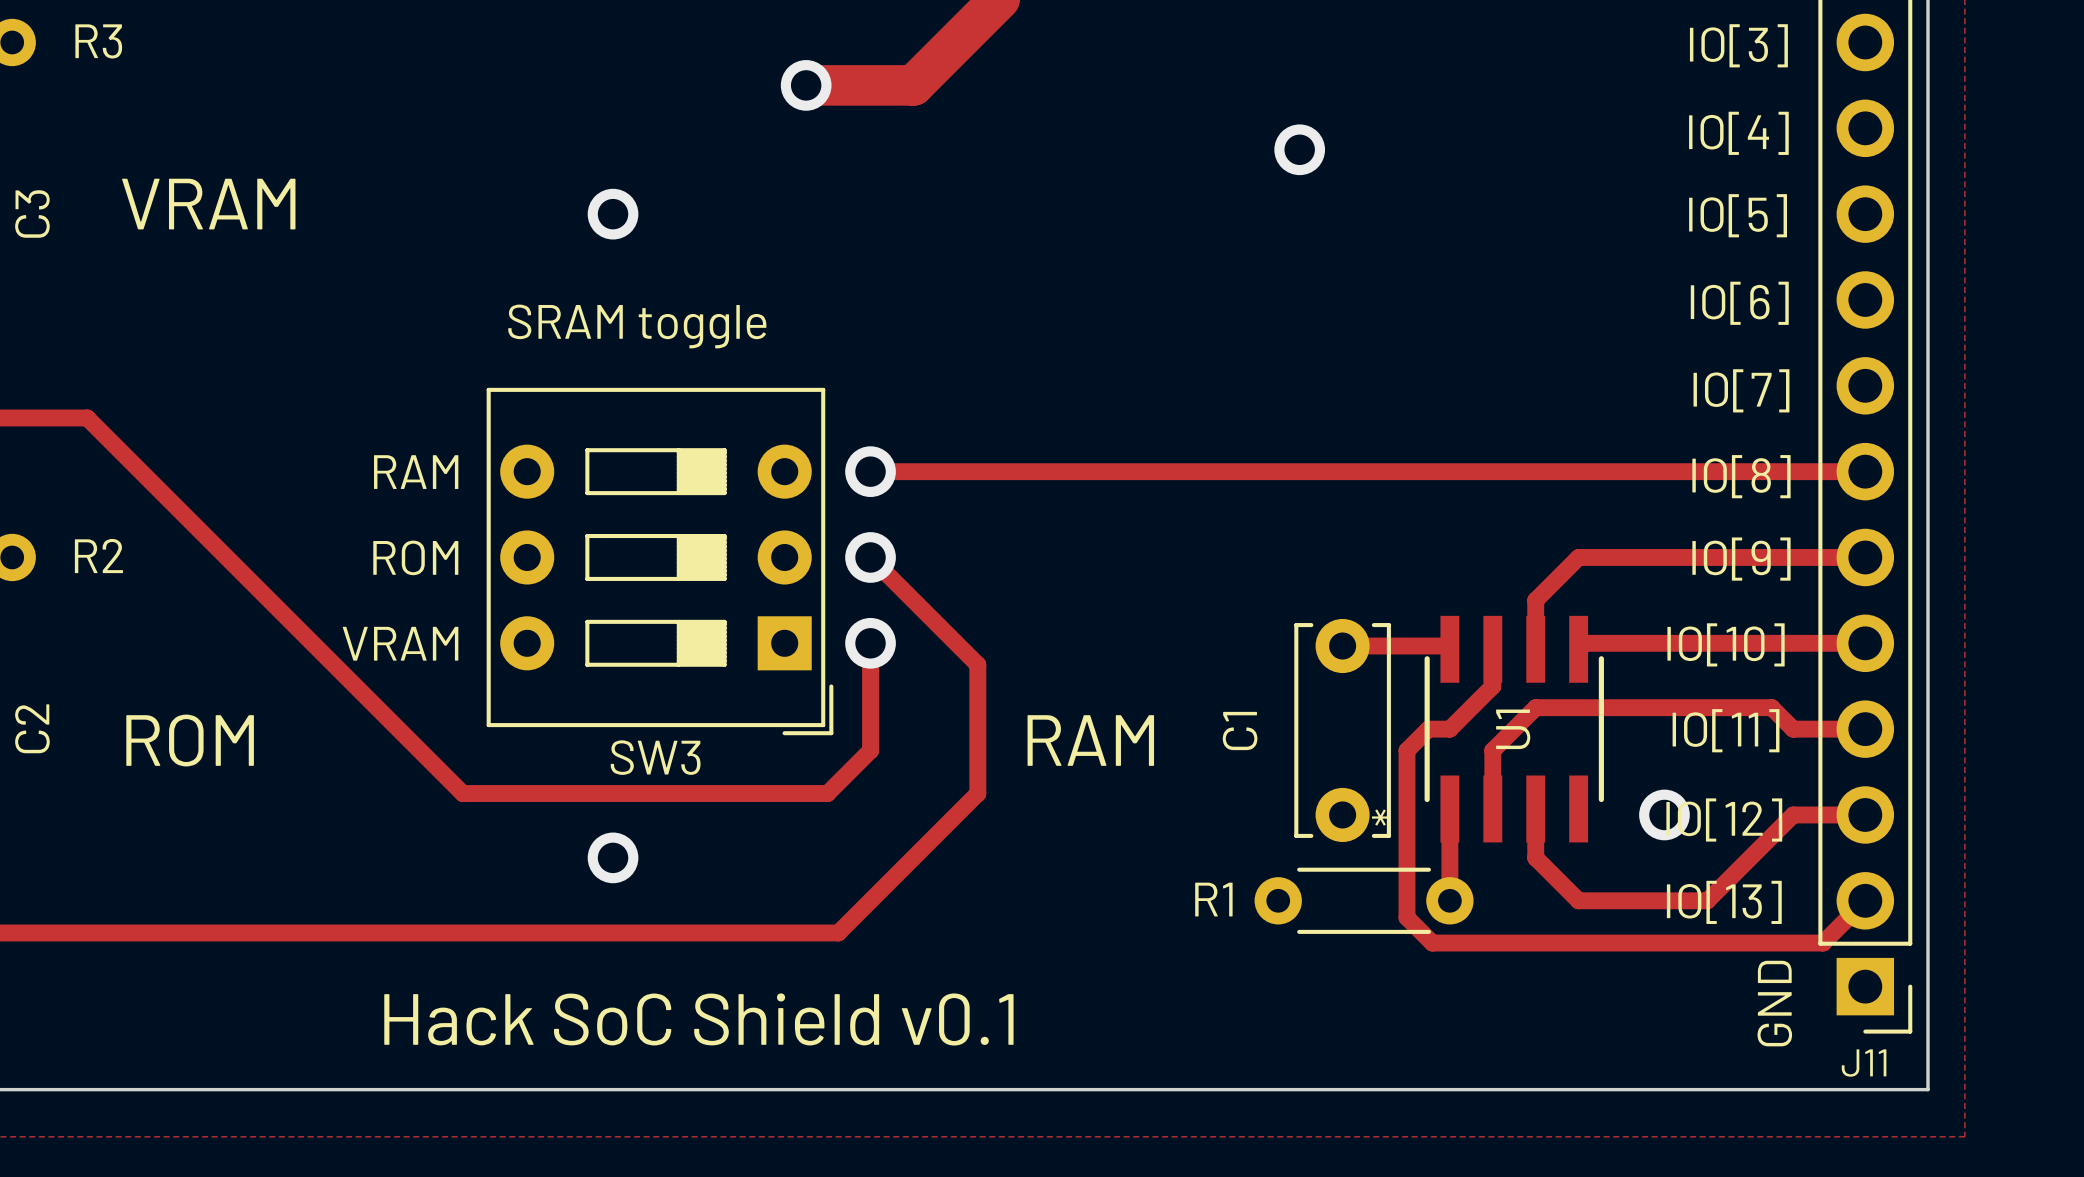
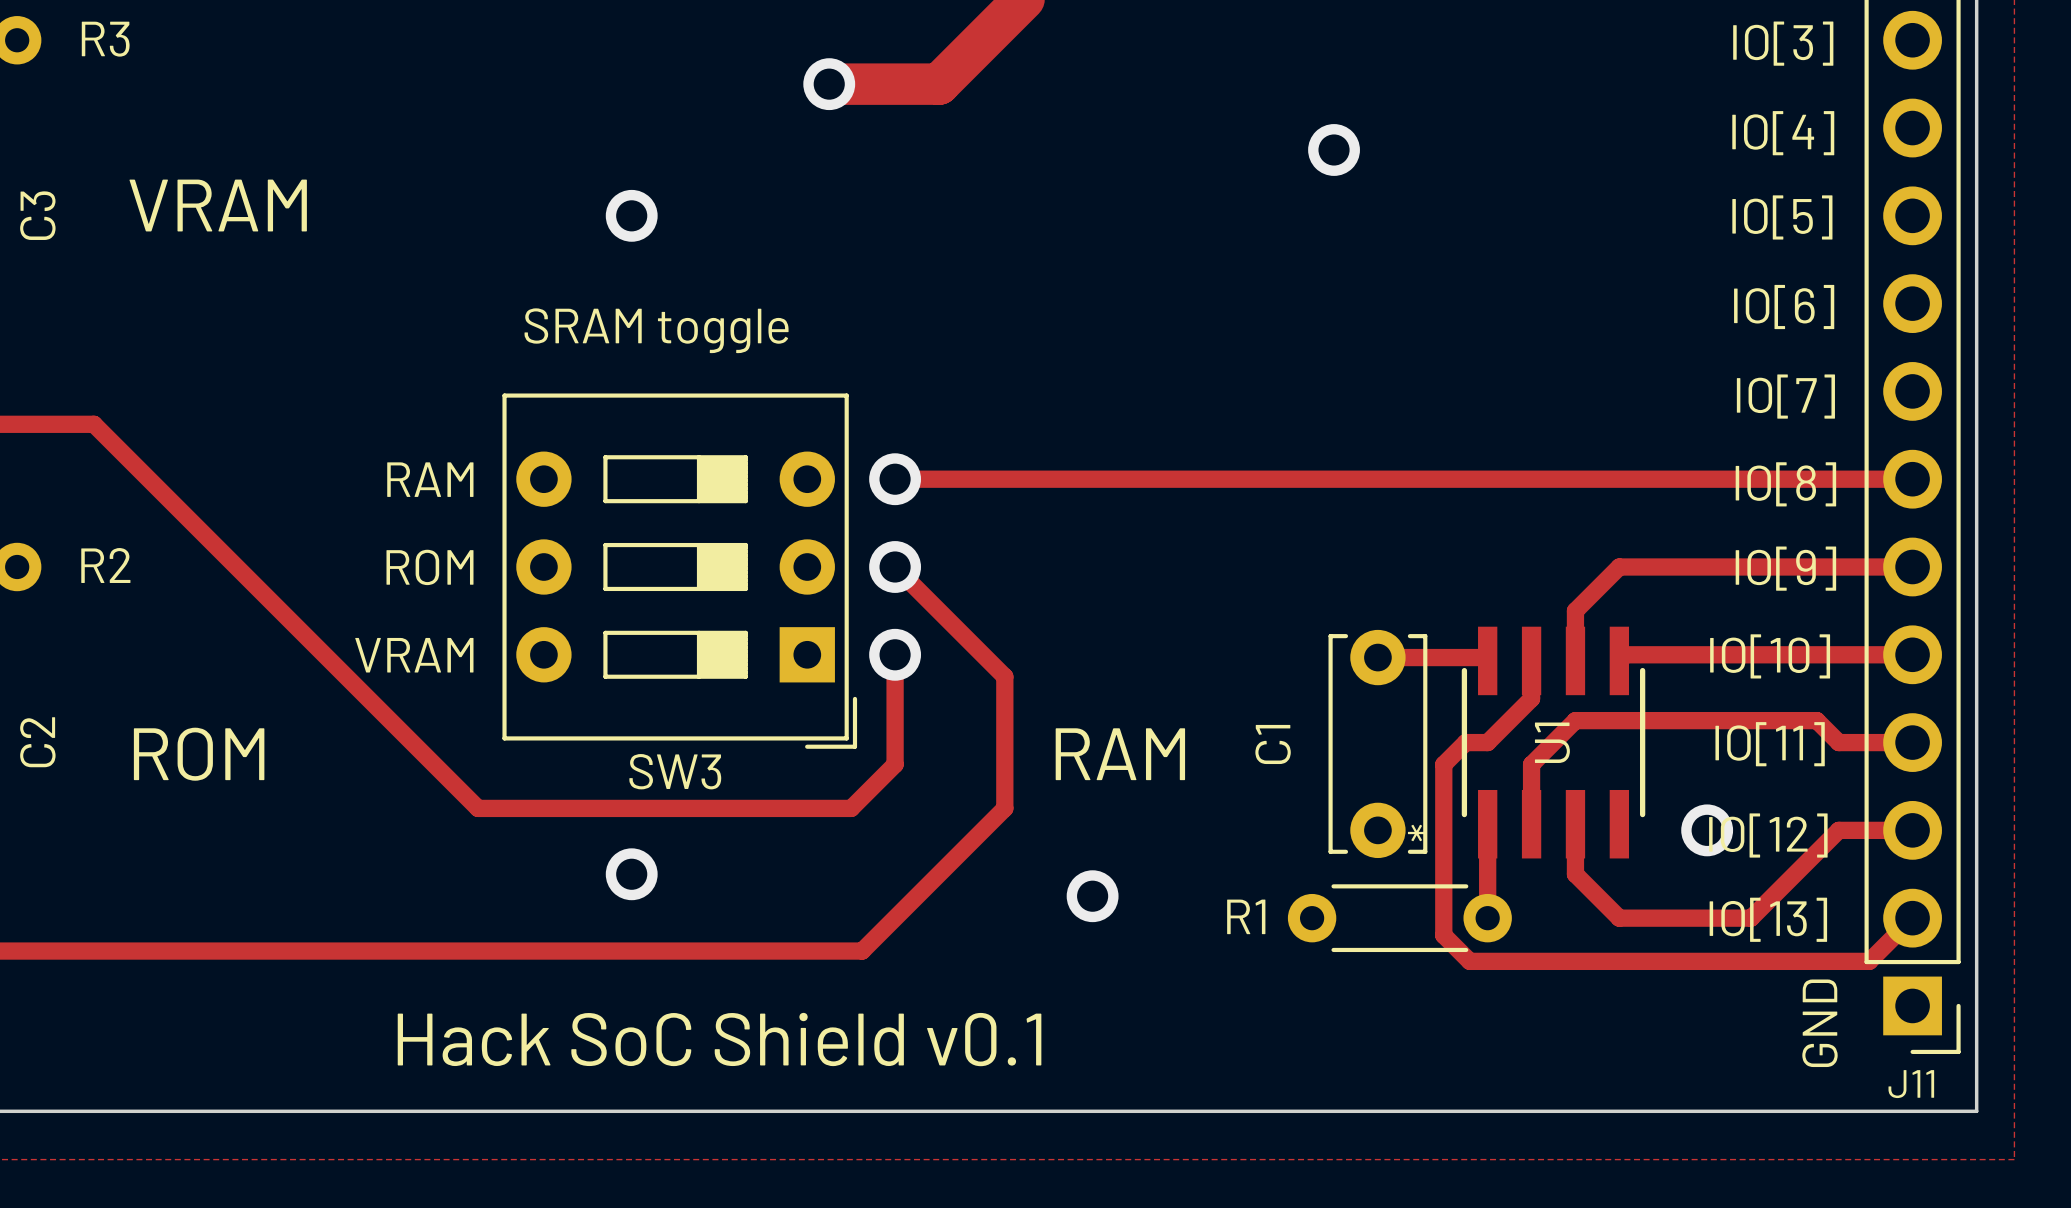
via: none -> (1092, 896)

